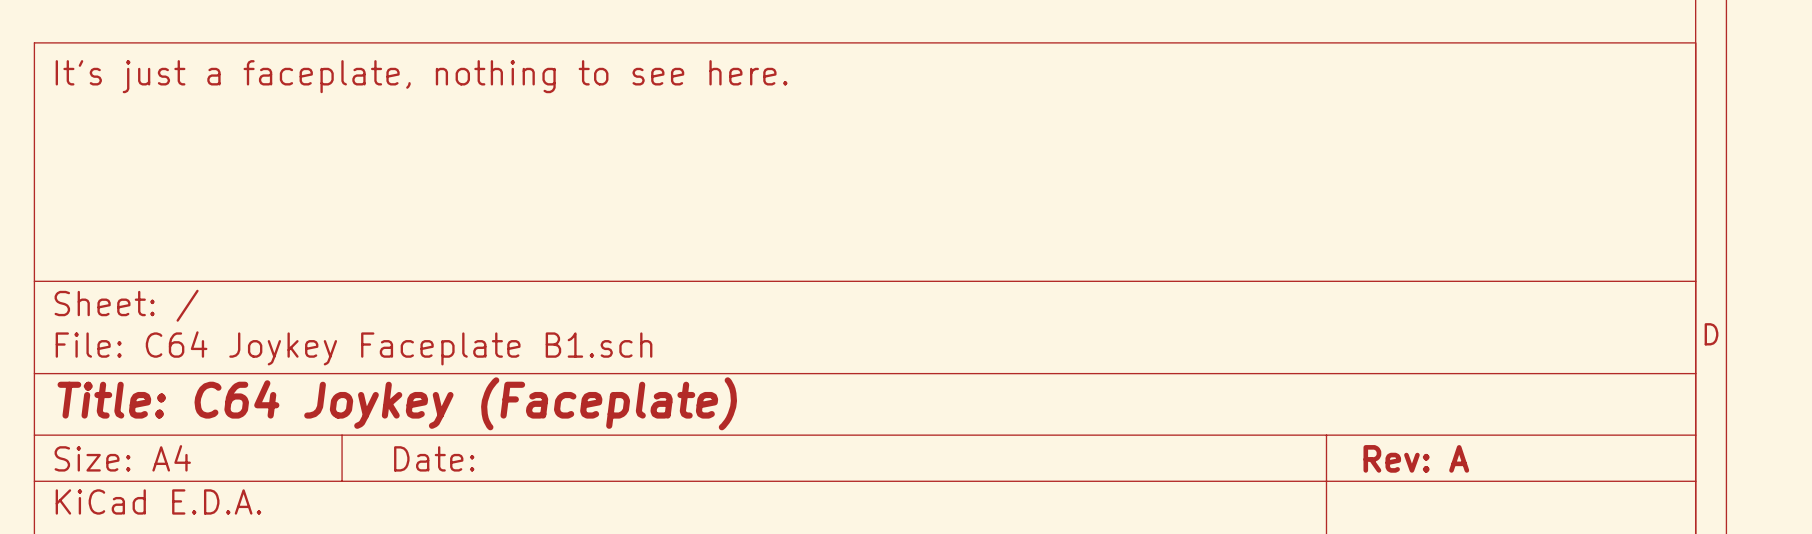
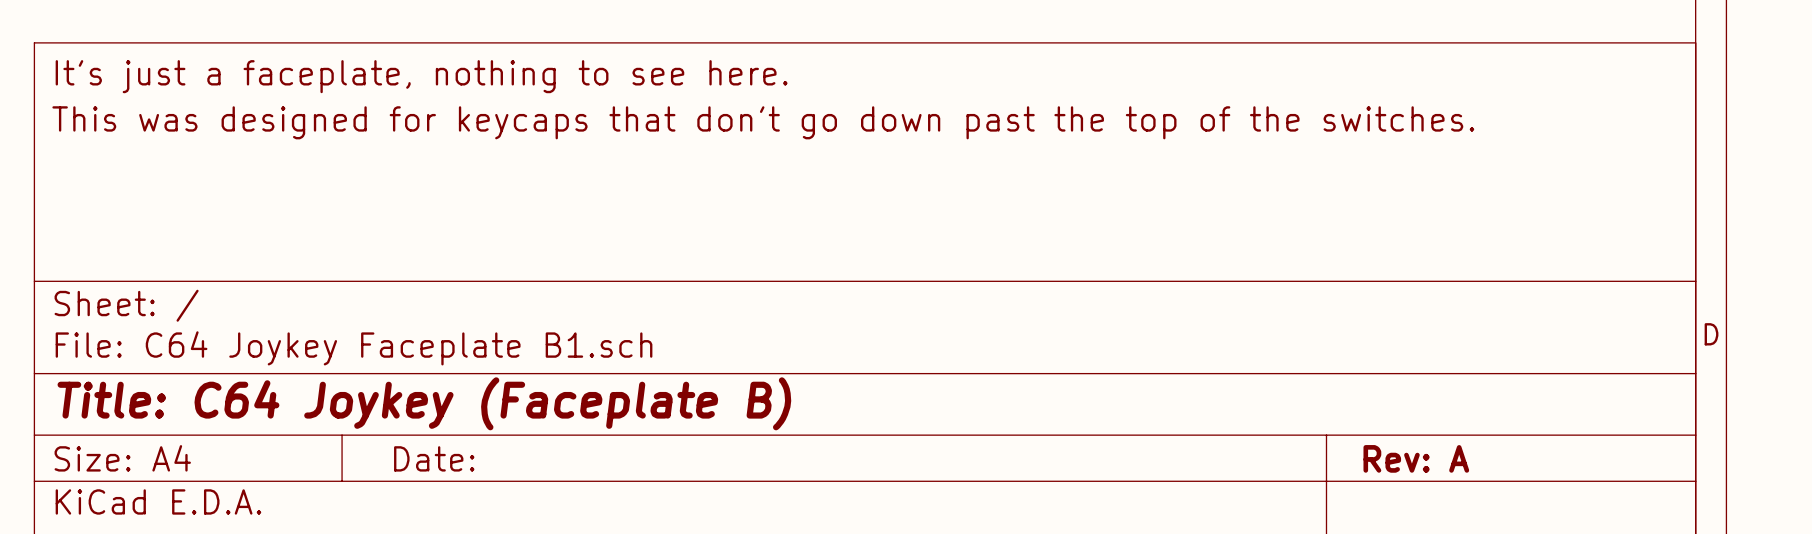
title block: none -> This was designed for keycaps that don't go down past the top of the switches. (763, 122)
title block: Title: C64 Joykey (Faceplate) (397, 403) -> Title: C64 Joykey (Faceplate B) (424, 403)

